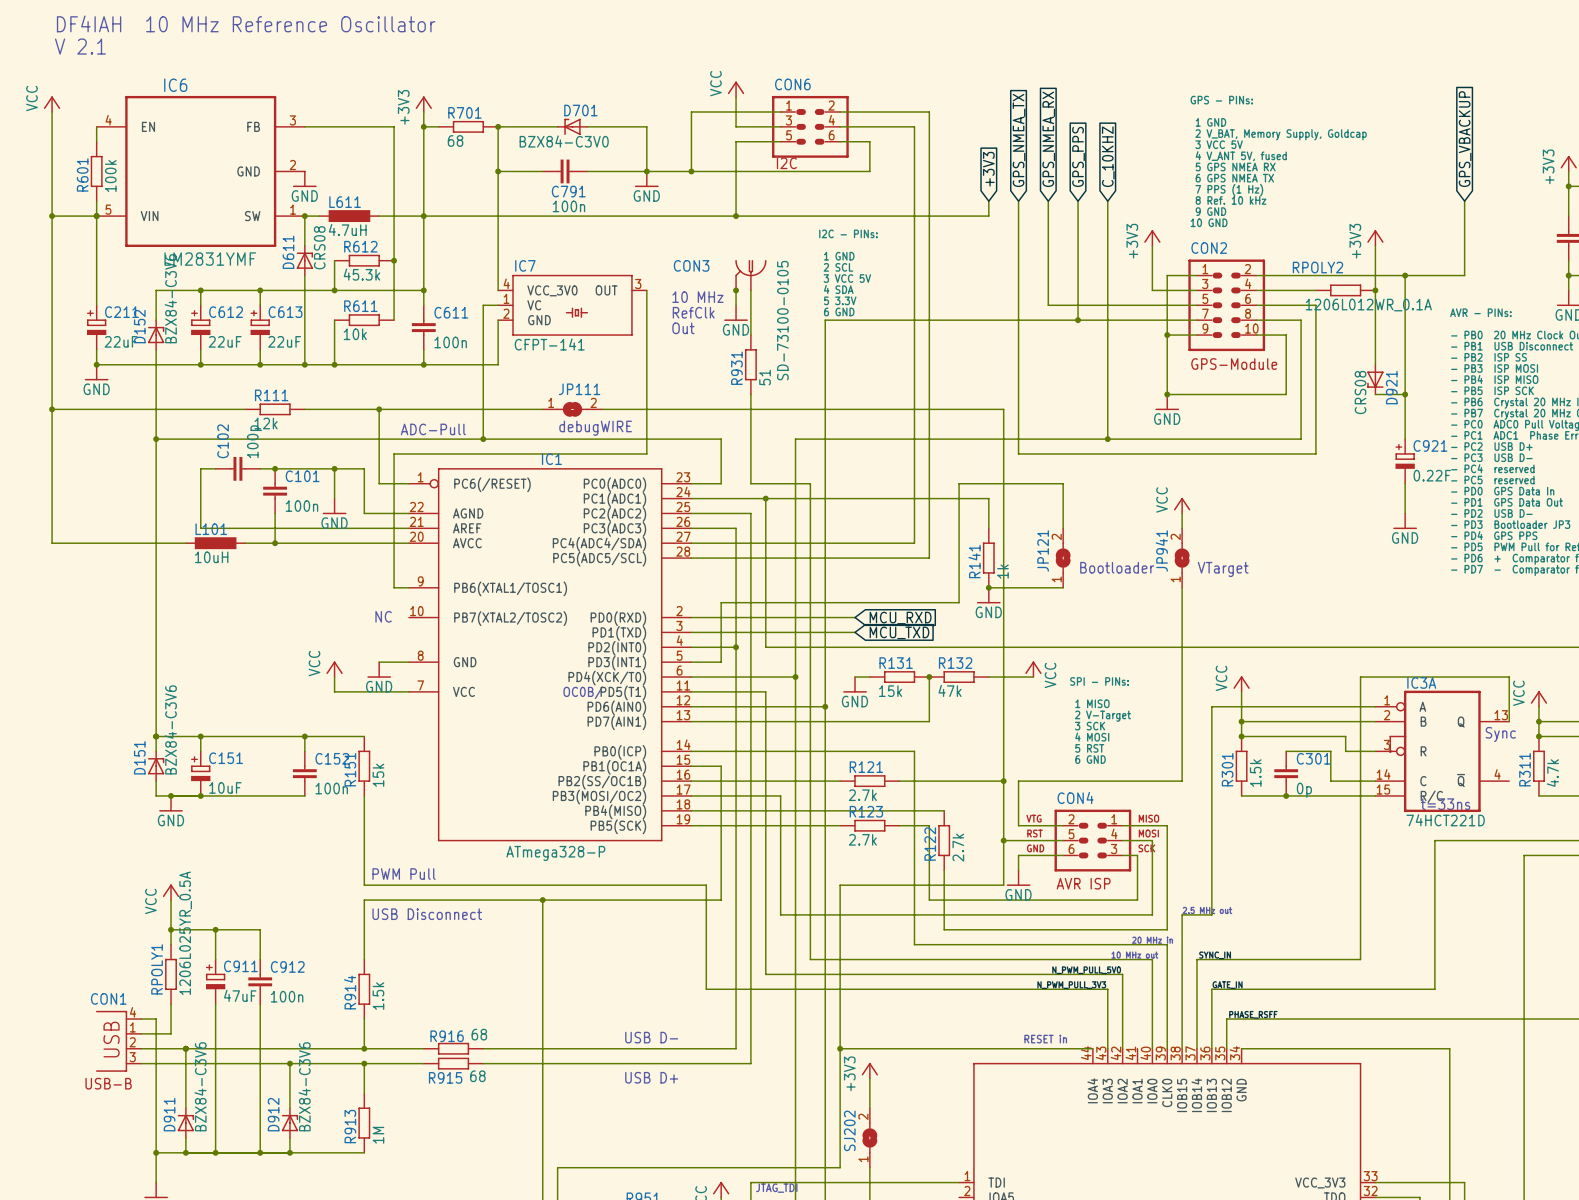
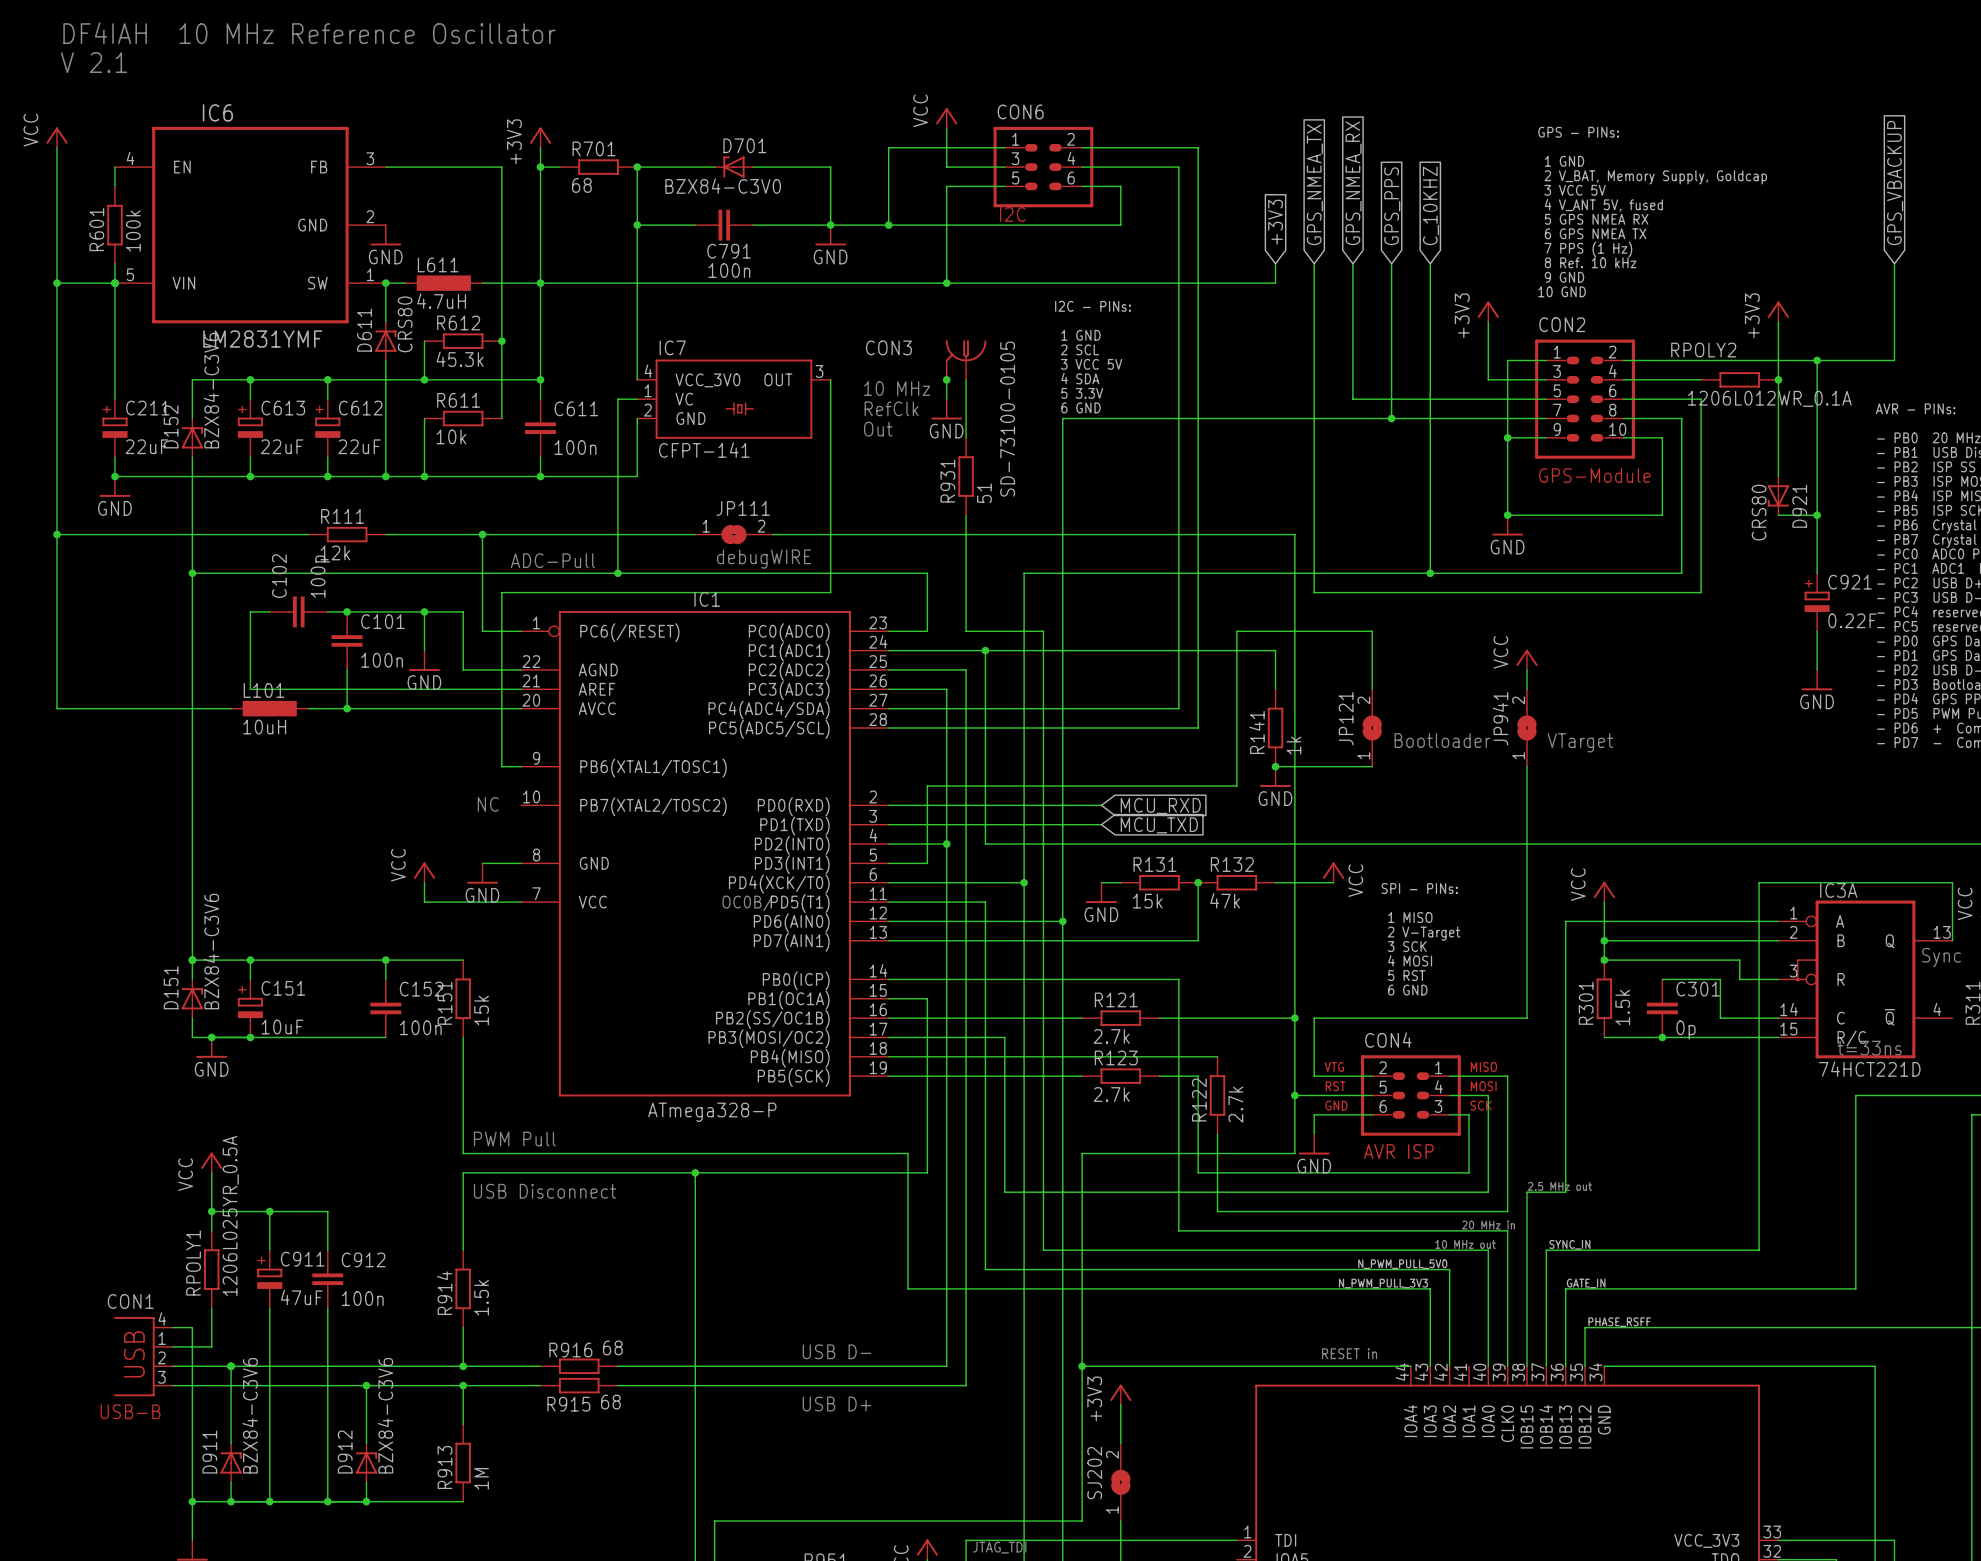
D611 value: CRS08 (319, 247) -> CRS80 (405, 324)
C612 name: C612 (226, 312) -> C613 (283, 408)
C613 name: C613 (285, 312) -> C612 (360, 408)
D921 value: CRS08 (1360, 392) -> CRS80 (1759, 512)

